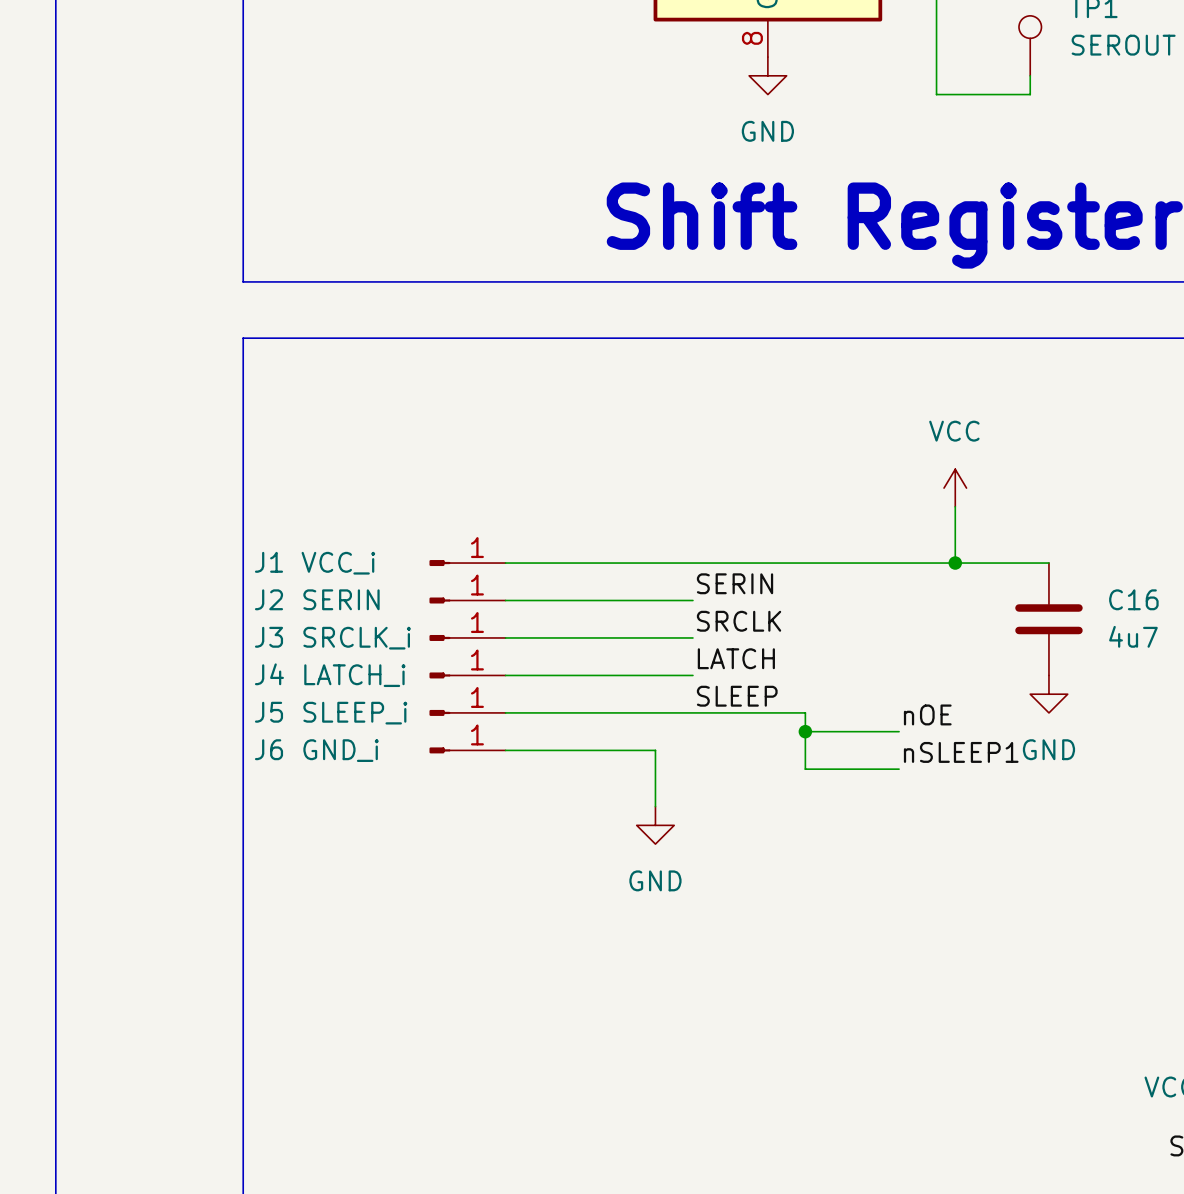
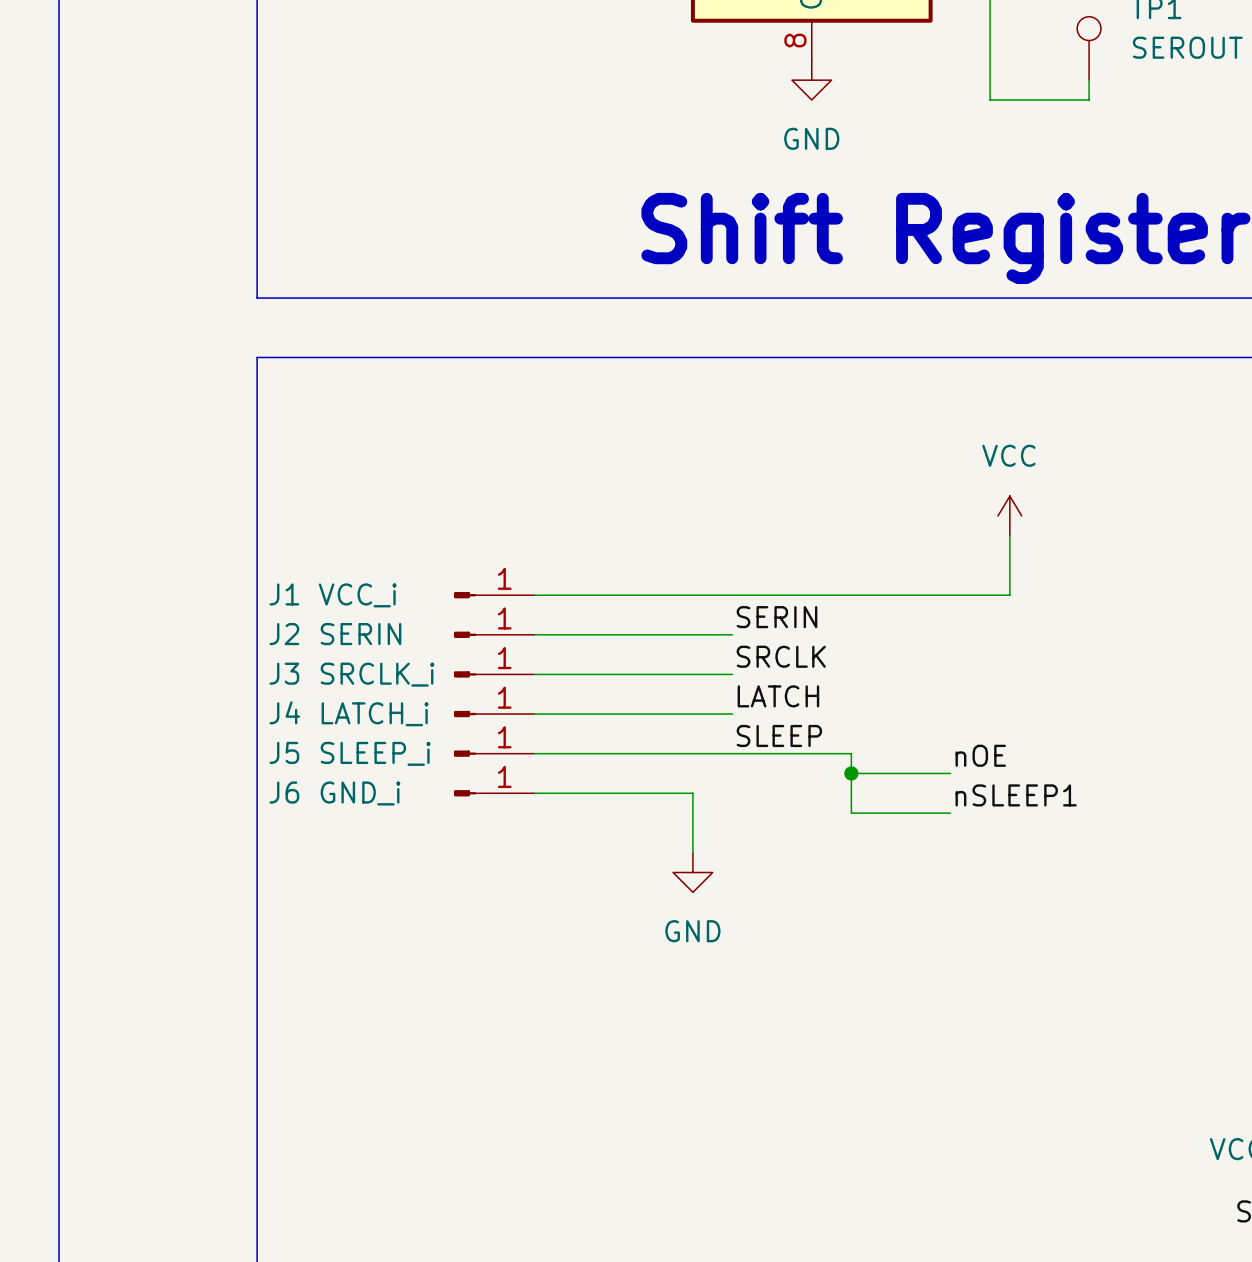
wire: (955, 563) (1048, 563) -> none
junction: (955, 563) -> none
C16: 4u7 (1048, 619) -> none
power symbol: GND (1048, 694) -> none

